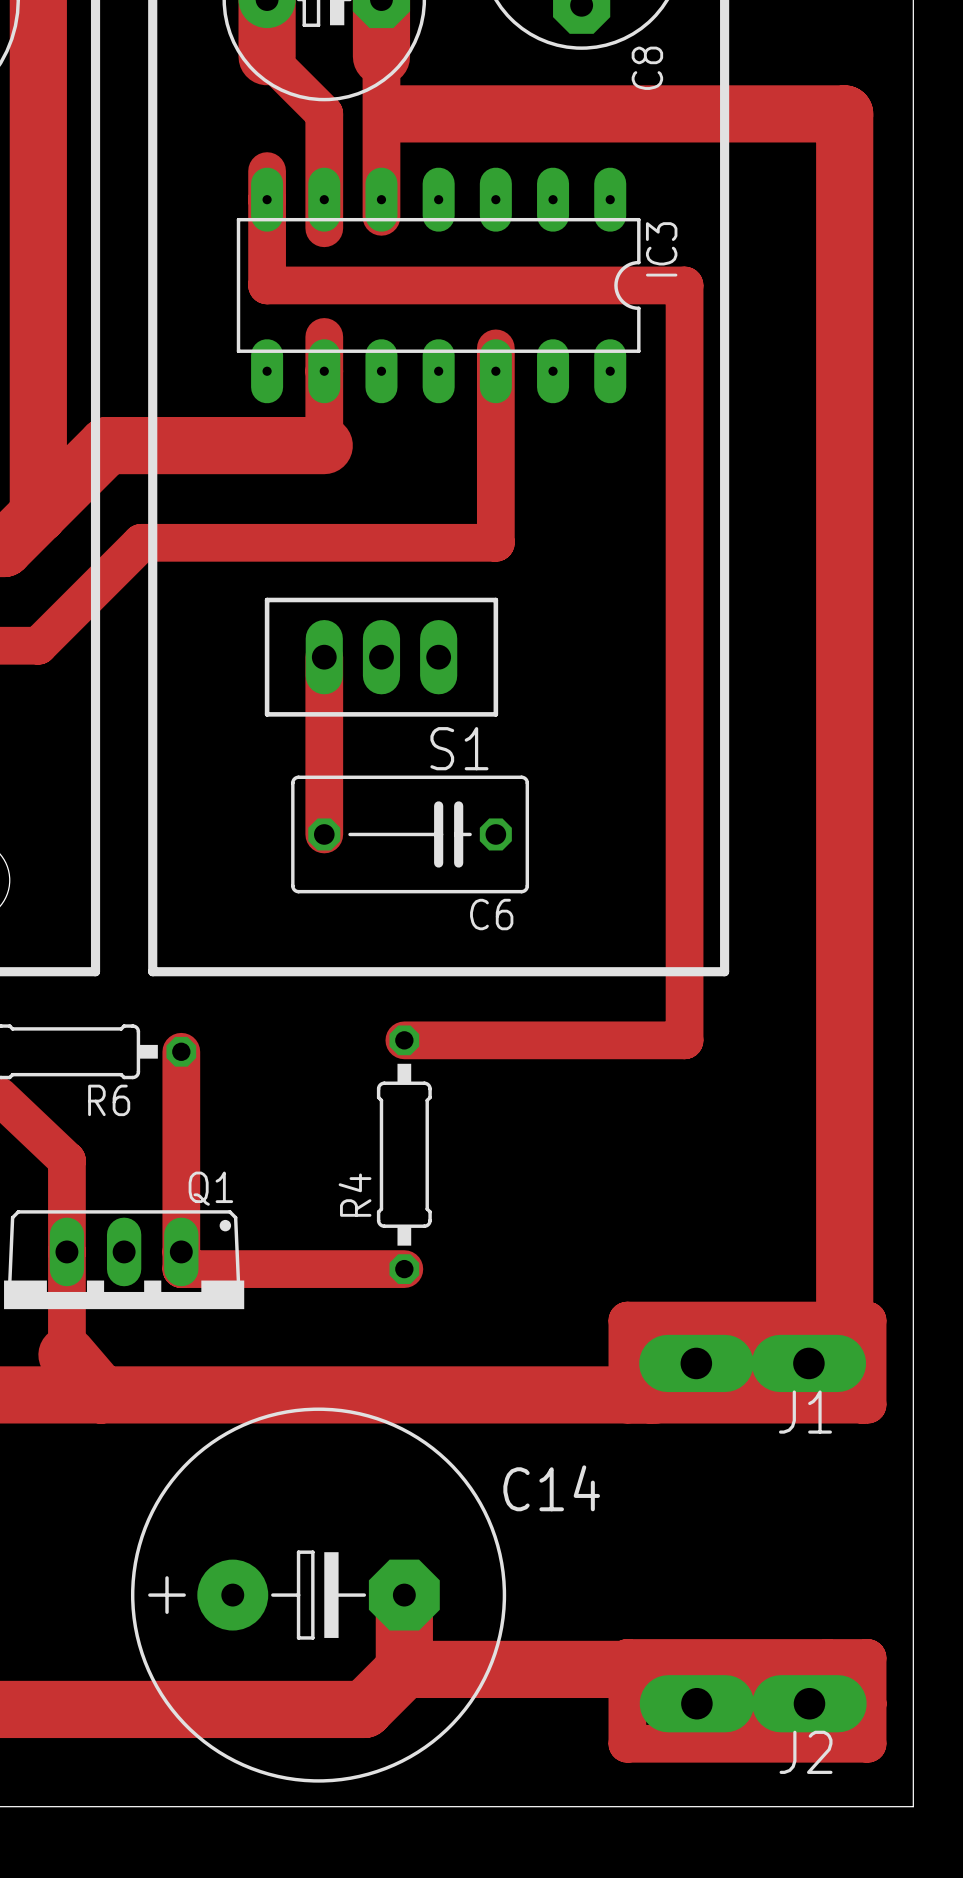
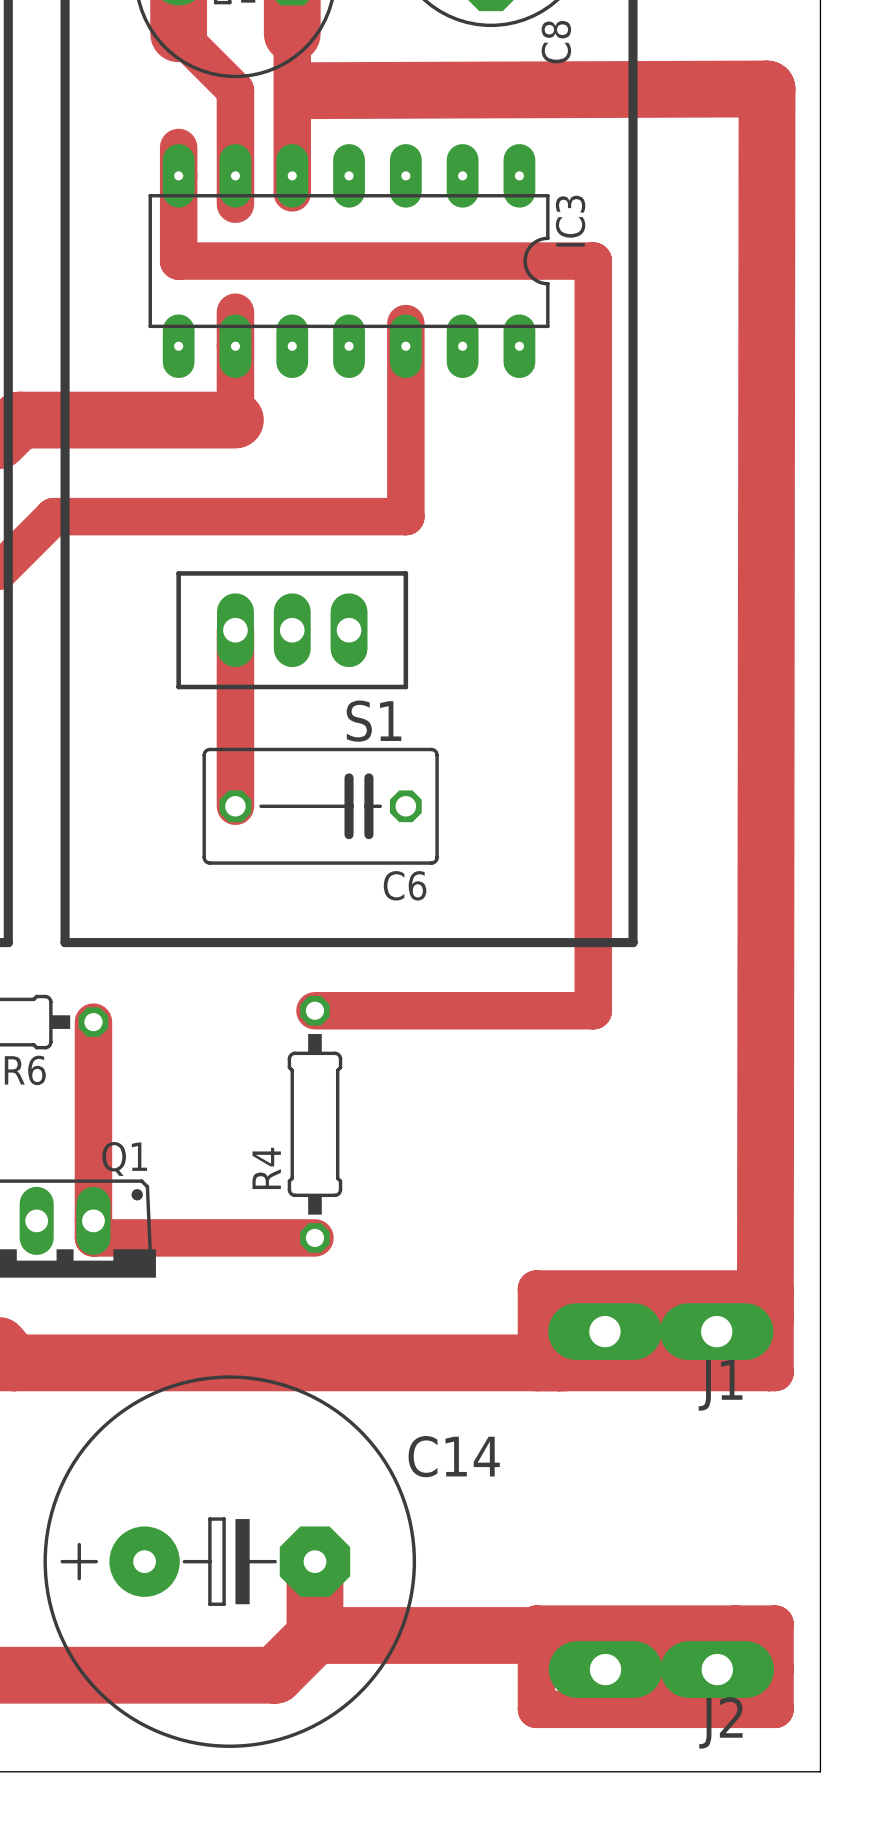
track: (392, 113) (844, 113) (844, 1354) -> (303, 90) (767, 88) (765, 1320)

